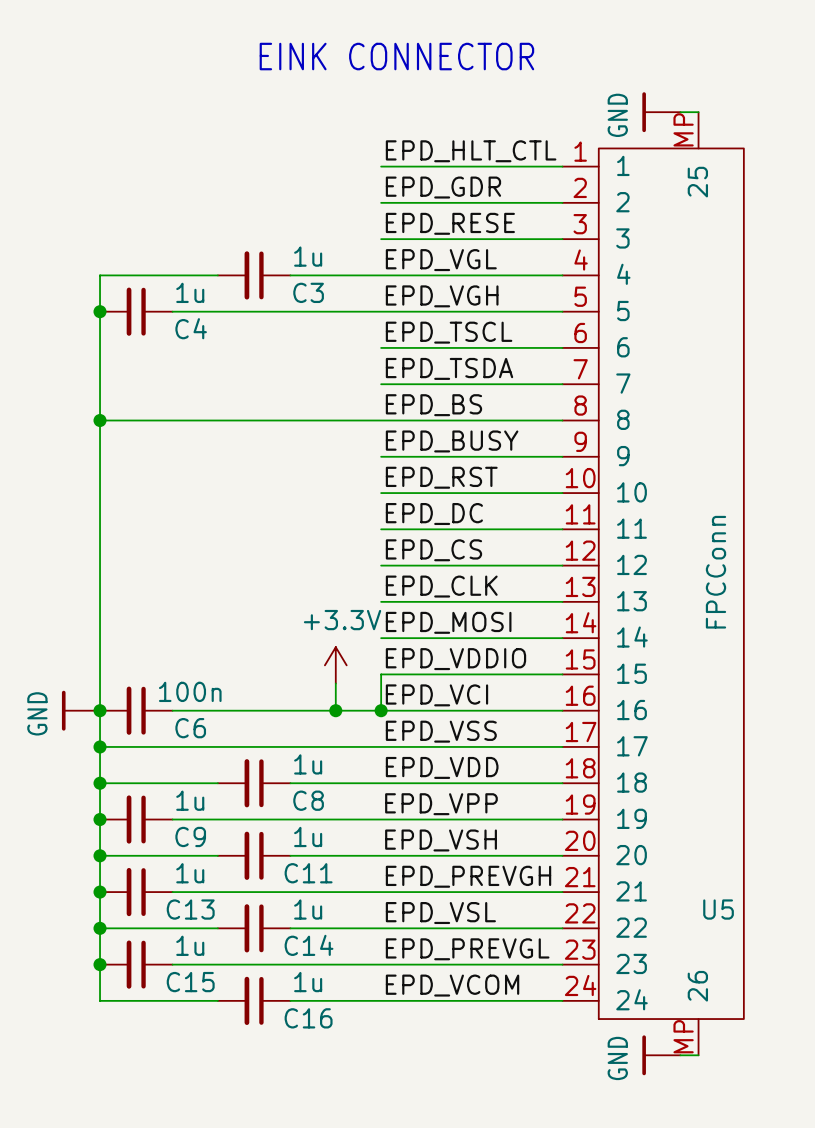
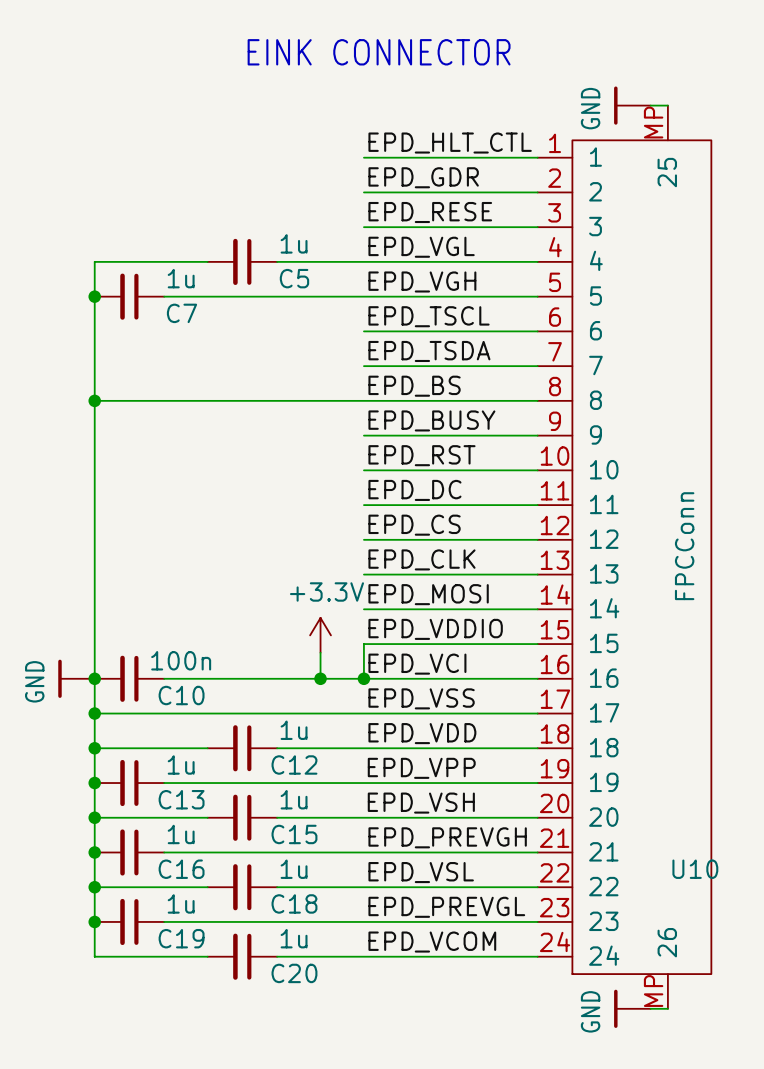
C3 name: C3 (308, 292) -> C5 (294, 278)
C4 name: C4 (191, 328) -> C7 (181, 313)
C6 name: C6 (190, 728) -> C10 (181, 695)
C8 name: C8 (308, 800) -> C12 (294, 764)
C9 name: C9 (190, 836) -> C13 (181, 799)
C11 name: C11 (308, 873) -> C15 (294, 834)
C13 name: C13 (190, 909) -> C16 (181, 869)
U5 name: U5 (718, 909) -> U10 (695, 869)
C14 name: C14 (309, 945) -> C18 (294, 903)
C15 name: C15 (190, 982) -> C19 (181, 938)
C16 name: C16 (308, 1018) -> C20 (294, 973)

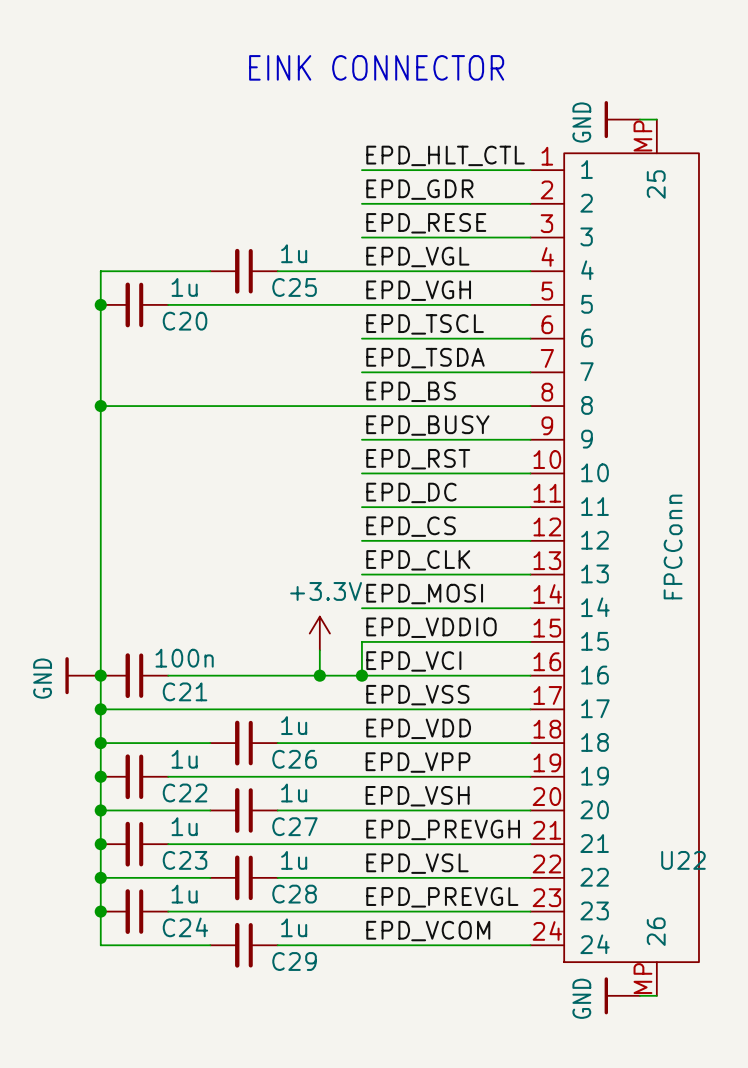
C5 name: C5 (294, 278) -> C25 (294, 287)
C7 name: C7 (181, 313) -> C20 (185, 321)
C10 name: C10 (181, 695) -> C21 (185, 691)
C12 name: C12 (294, 764) -> C26 (294, 759)
C13 name: C13 (181, 799) -> C22 (185, 792)
C15 name: C15 (294, 834) -> C27 (294, 826)
C16 name: C16 (181, 869) -> C23 (185, 860)
U10 name: U10 (695, 869) -> U22 (683, 860)
C18 name: C18 (294, 903) -> C28 (294, 894)
C19 name: C19 (181, 938) -> C24 (185, 927)
C20 name: C20 (294, 973) -> C29 (294, 961)

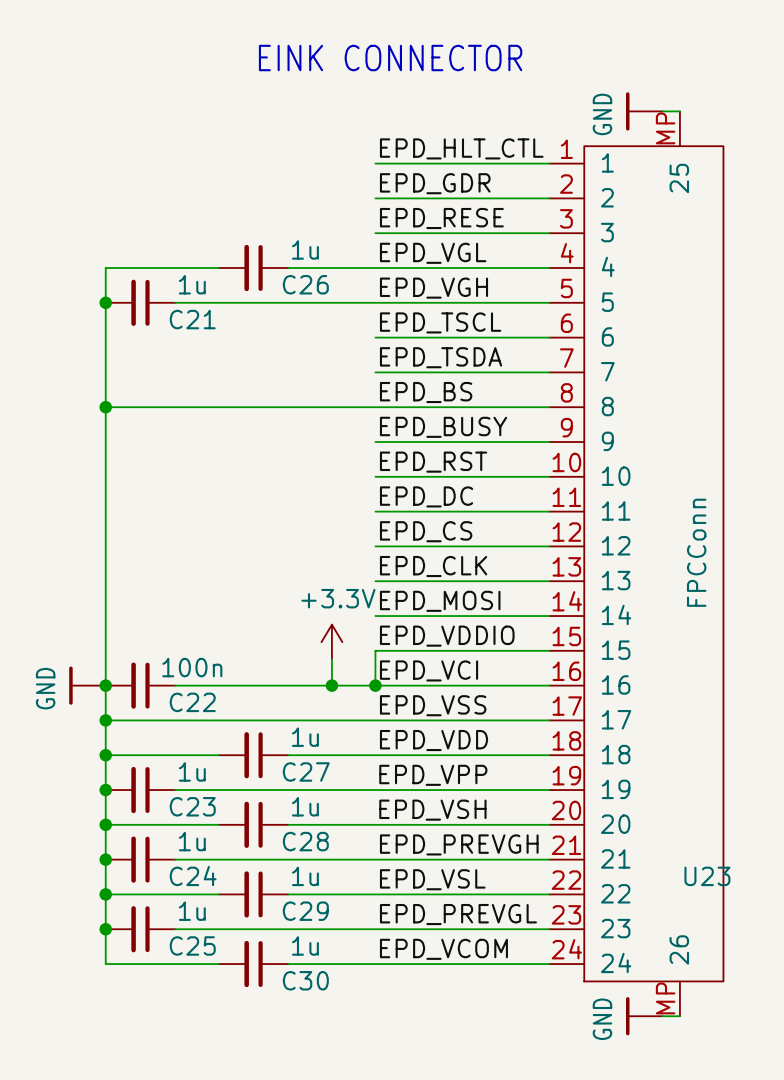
C25 name: C25 (294, 287) -> C26 (305, 284)
C20 name: C20 (185, 321) -> C21 (192, 319)
C21 name: C21 (185, 691) -> C22 (192, 702)
C26 name: C26 (294, 759) -> C27 (306, 771)
C22 name: C22 (185, 792) -> C23 (192, 806)
C27 name: C27 (294, 826) -> C28 (305, 841)
C23 name: C23 (185, 860) -> C24 (193, 875)
U22 name: U22 (683, 860) -> U23 (707, 876)
C28 name: C28 (294, 894) -> C29 (305, 911)
C24 name: C24 (185, 927) -> C25 (192, 945)
C29 name: C29 (294, 961) -> C30 (305, 980)

